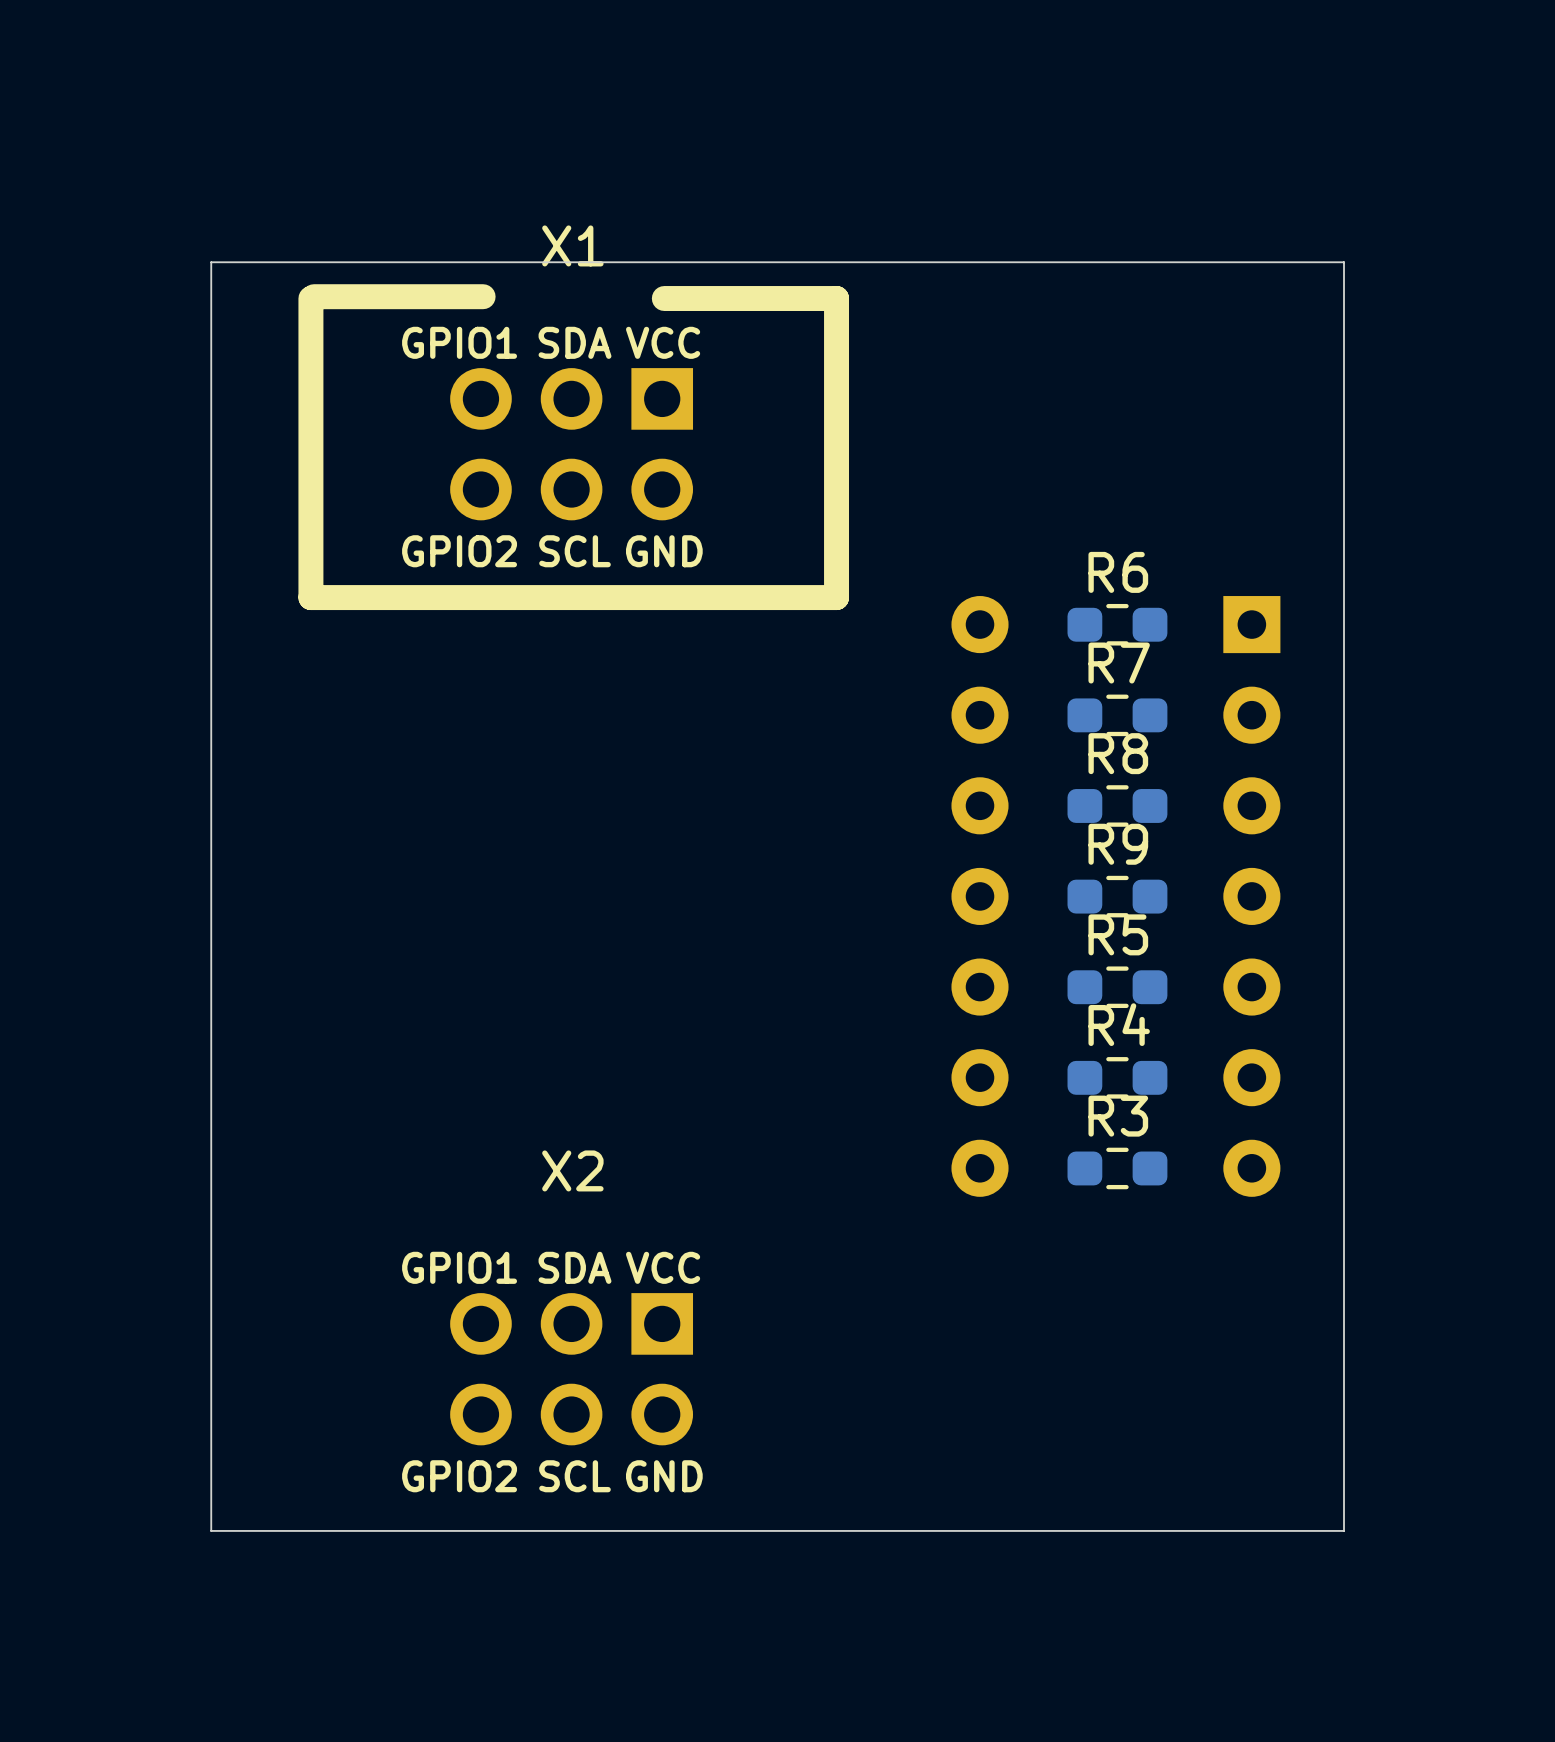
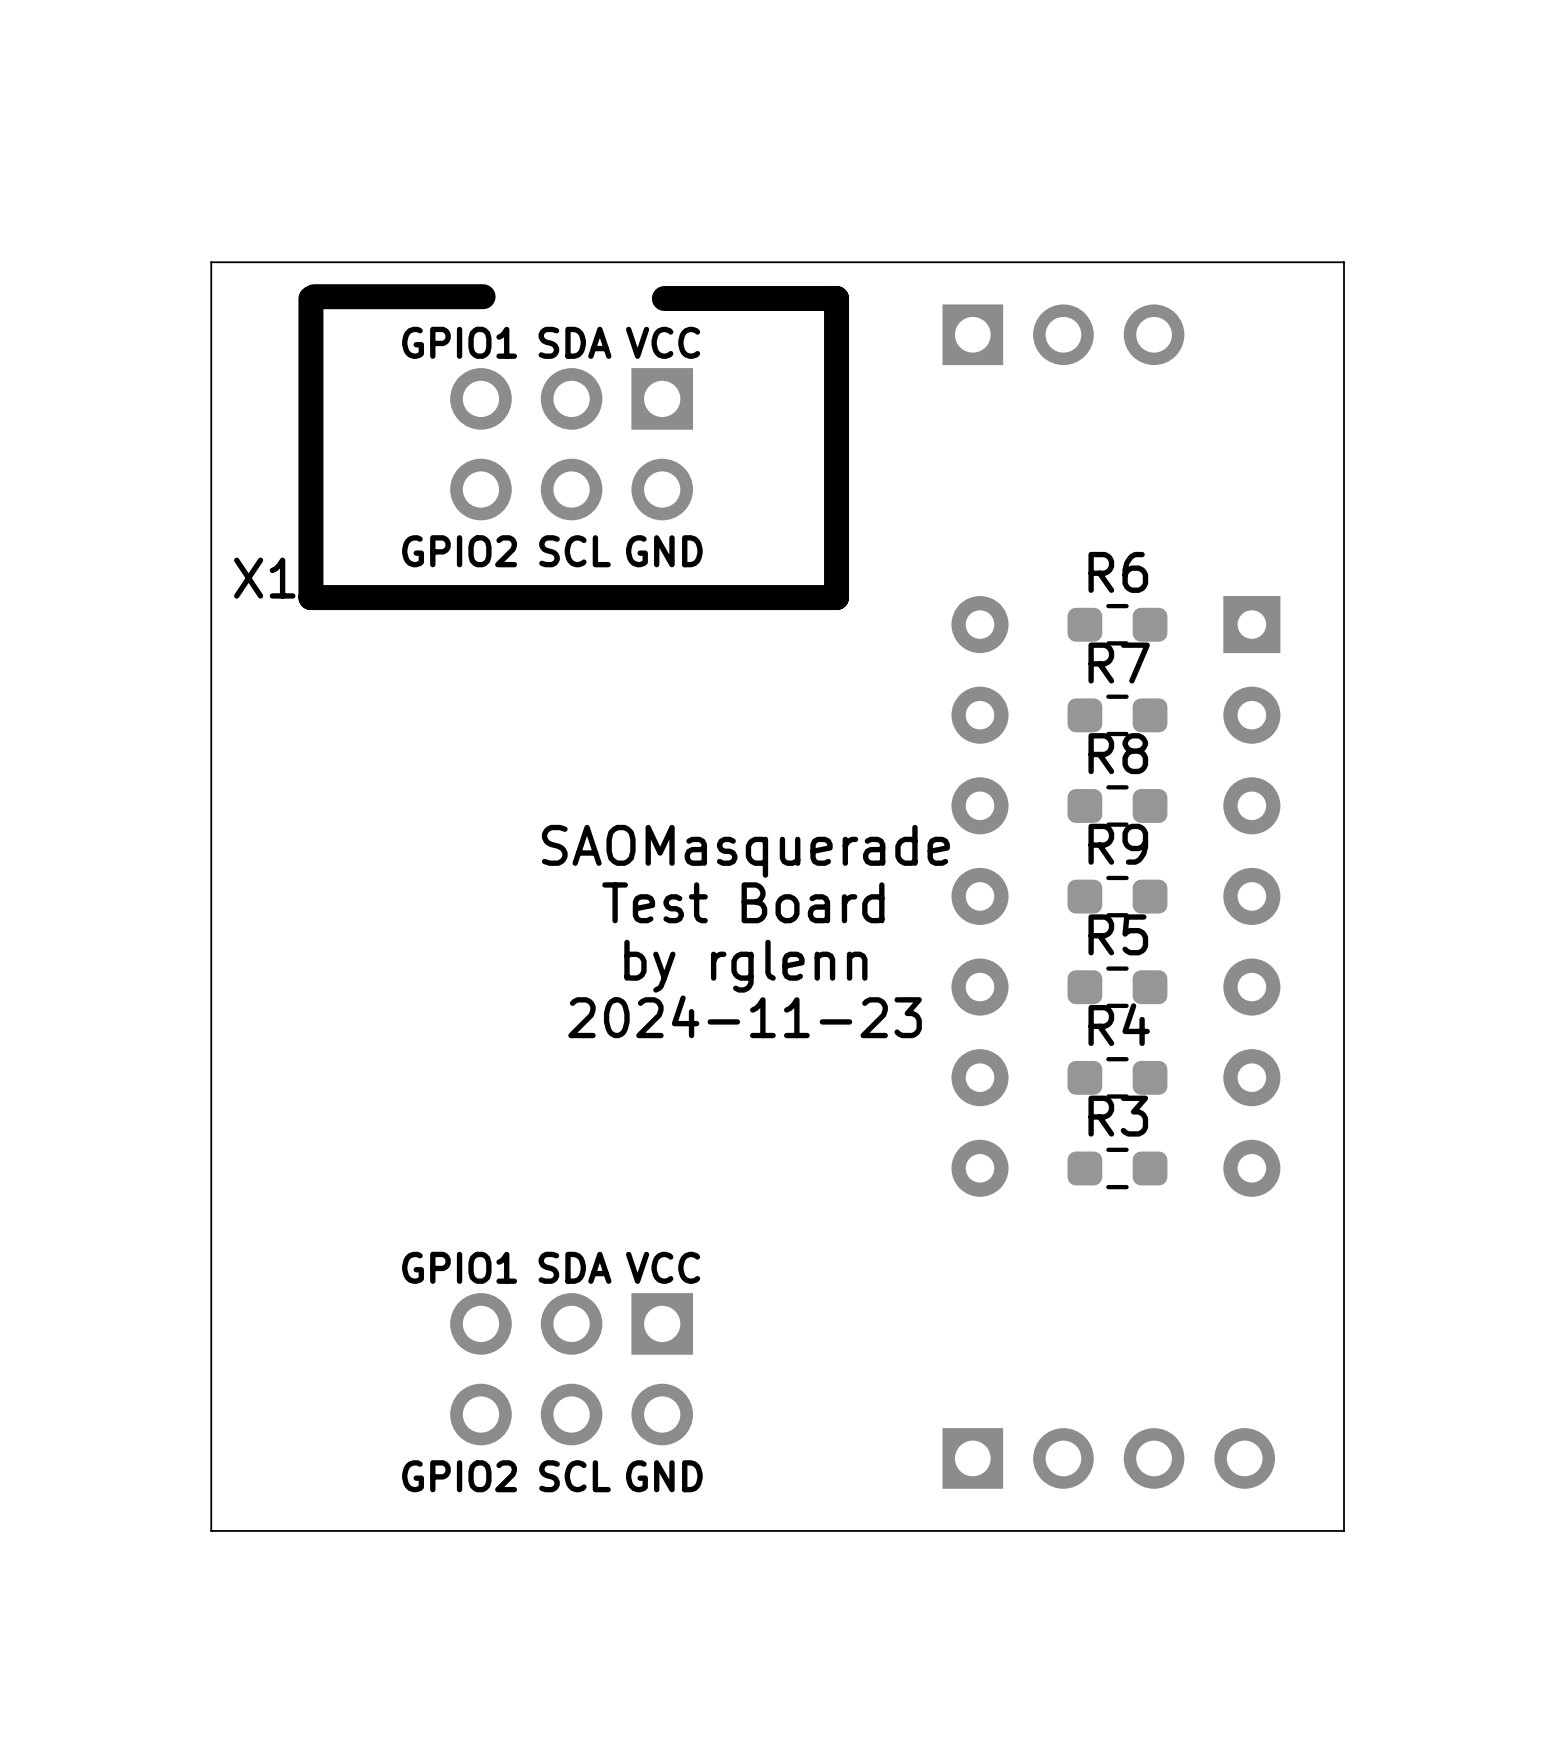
X1 name position: X1 (572, 245) -> X1 (264, 578)
part: none -> (1063, 334)
text: none -> SAOMasquerade (745, 851)
text: none -> Test Board (743, 902)
text: none -> by rglenn (745, 966)
text: none -> 2024-11-23 (745, 1016)
X2 name: X2 (572, 1170) -> none
part: none -> (1108, 1458)

